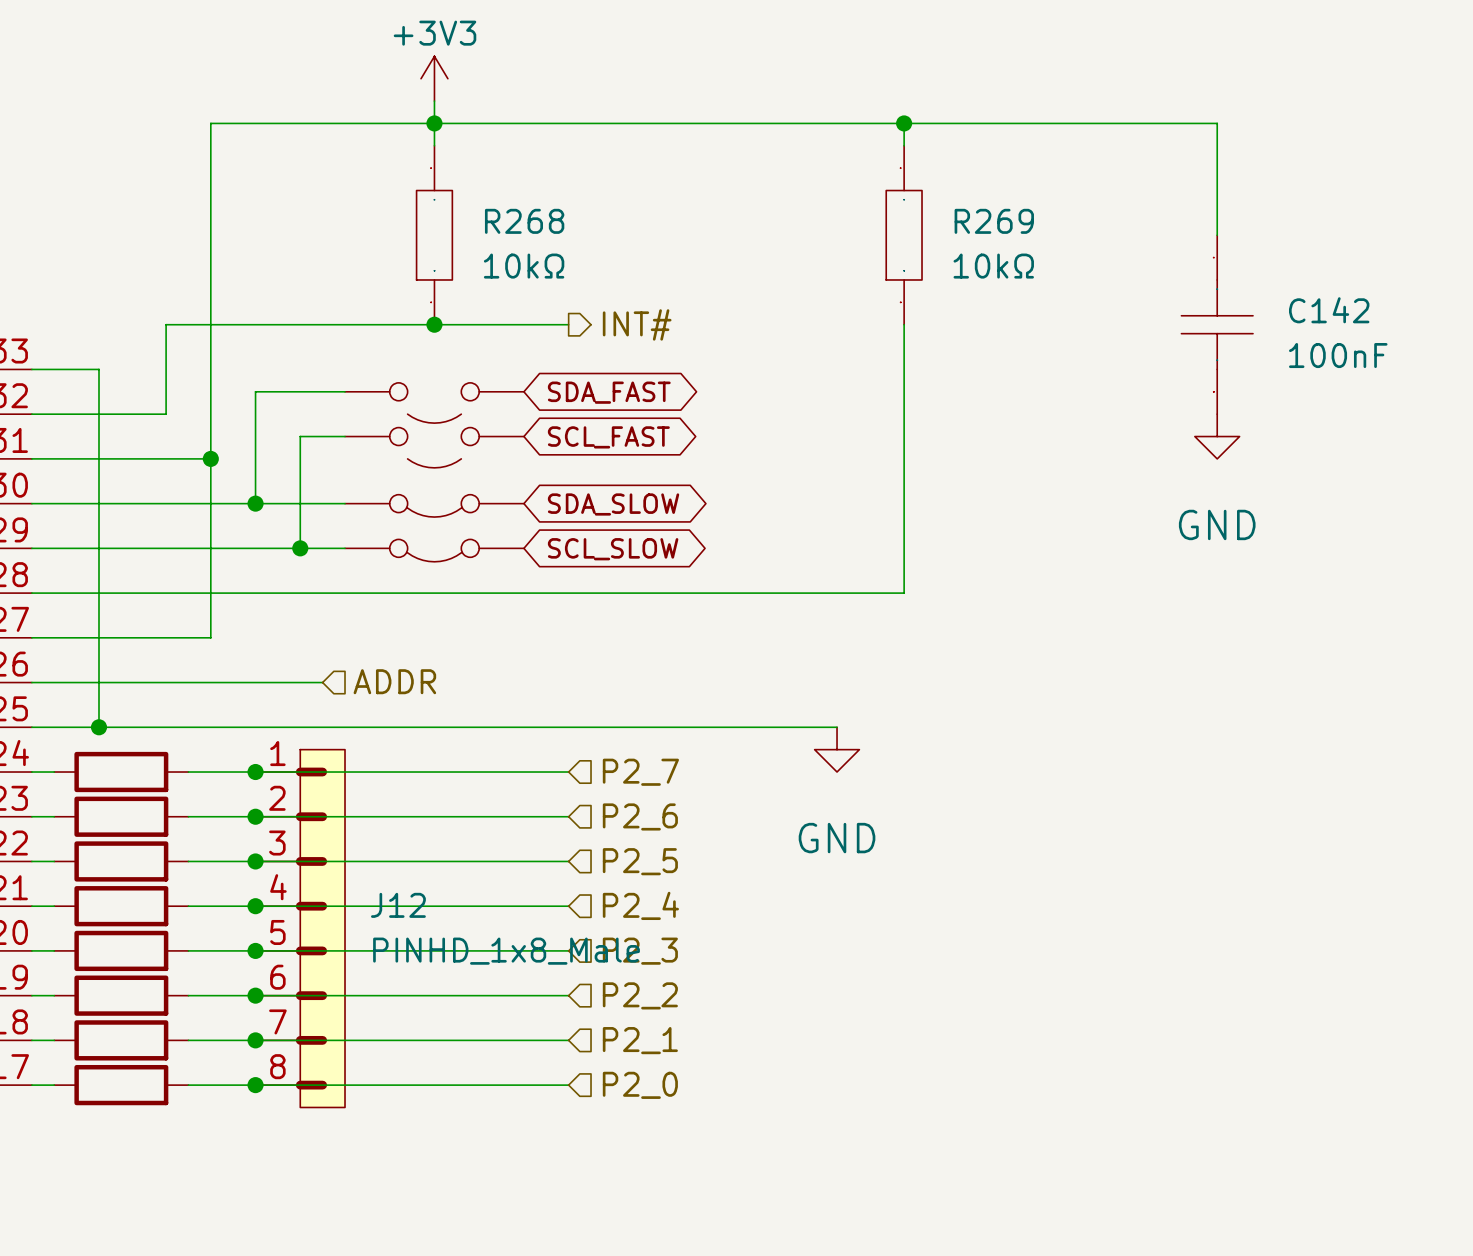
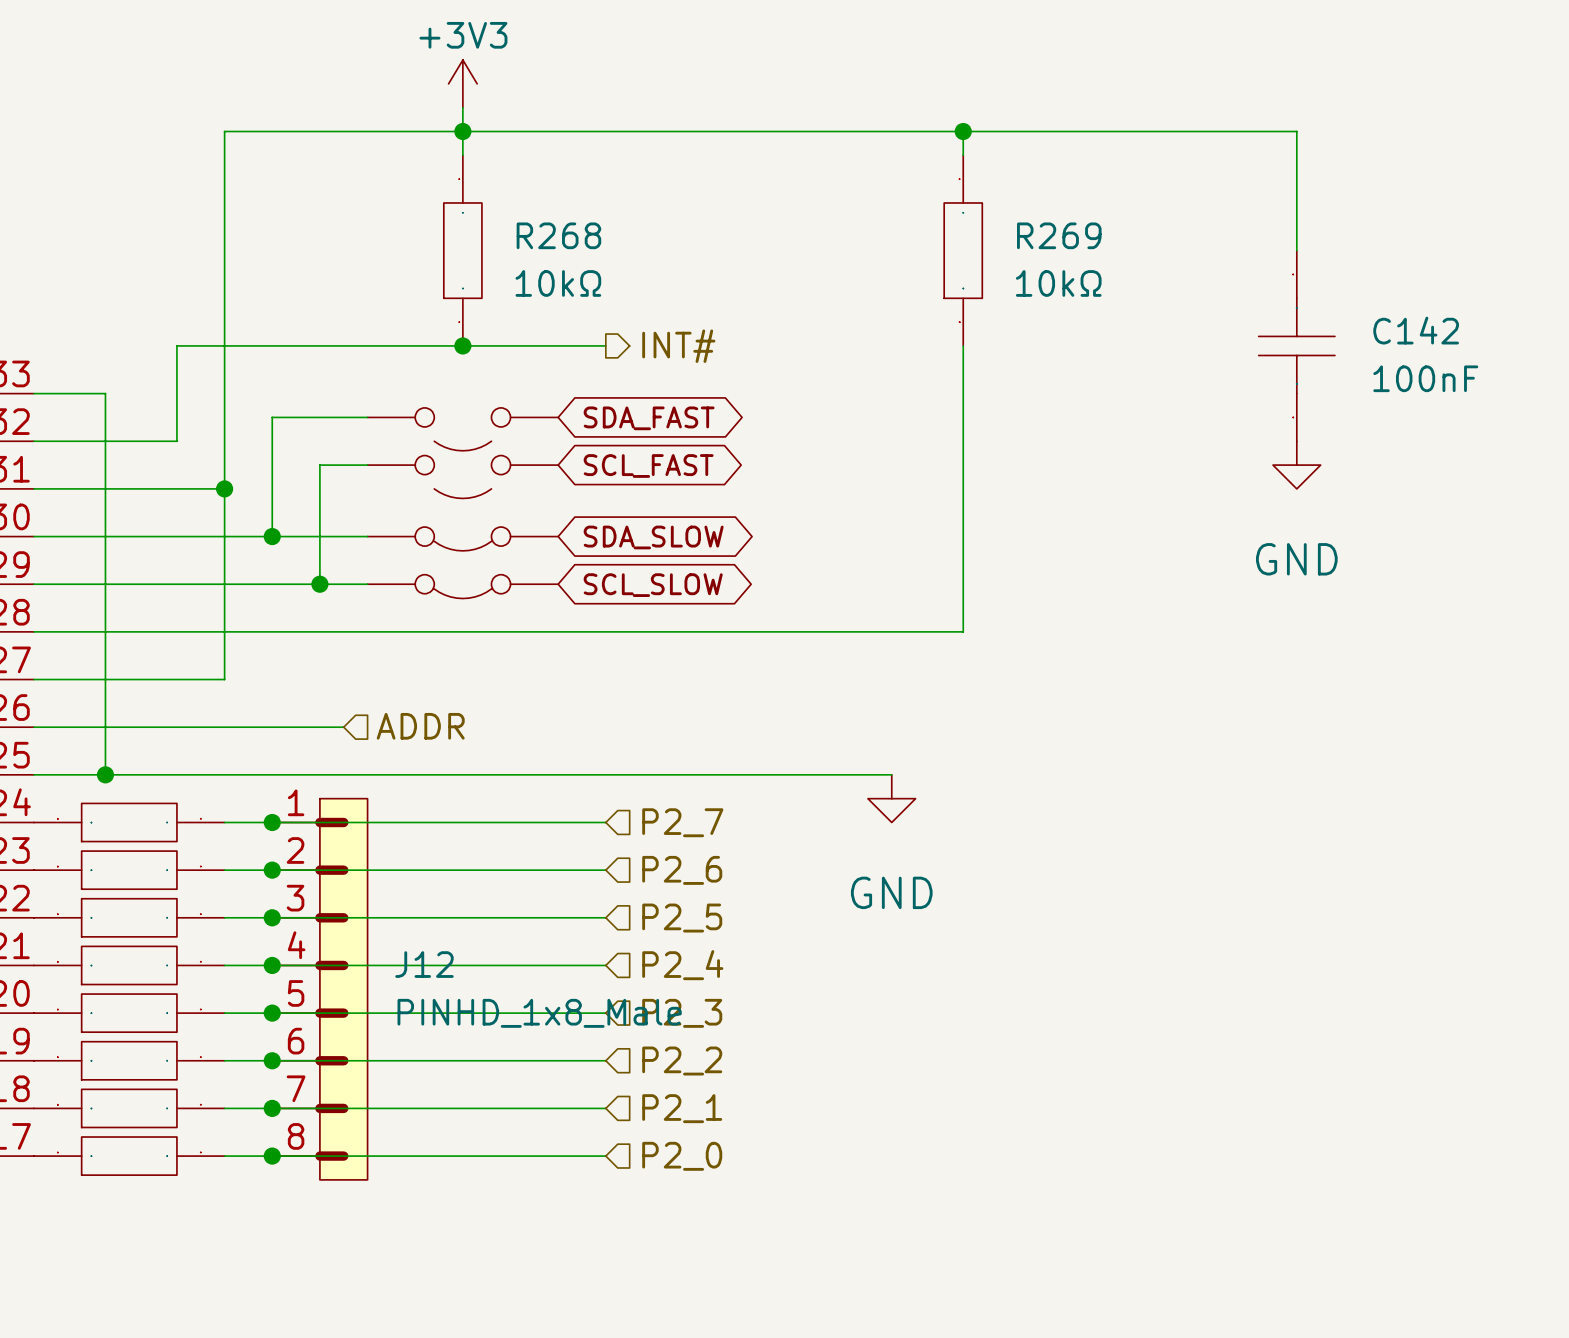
part symbol: [54, 751, 189, 793] -> [33, 803, 225, 842]
part symbol: [54, 796, 189, 837] -> [33, 851, 225, 890]
part symbol: [54, 841, 189, 882] -> [33, 898, 225, 937]
part symbol: [54, 886, 189, 927] -> [33, 946, 225, 985]
part symbol: [54, 930, 189, 972] -> [33, 994, 225, 1033]
part symbol: [54, 975, 189, 1016] -> [33, 1041, 225, 1080]
part symbol: [54, 1020, 189, 1061] -> [33, 1089, 225, 1128]
part symbol: [54, 1064, 189, 1106] -> [33, 1137, 225, 1176]

